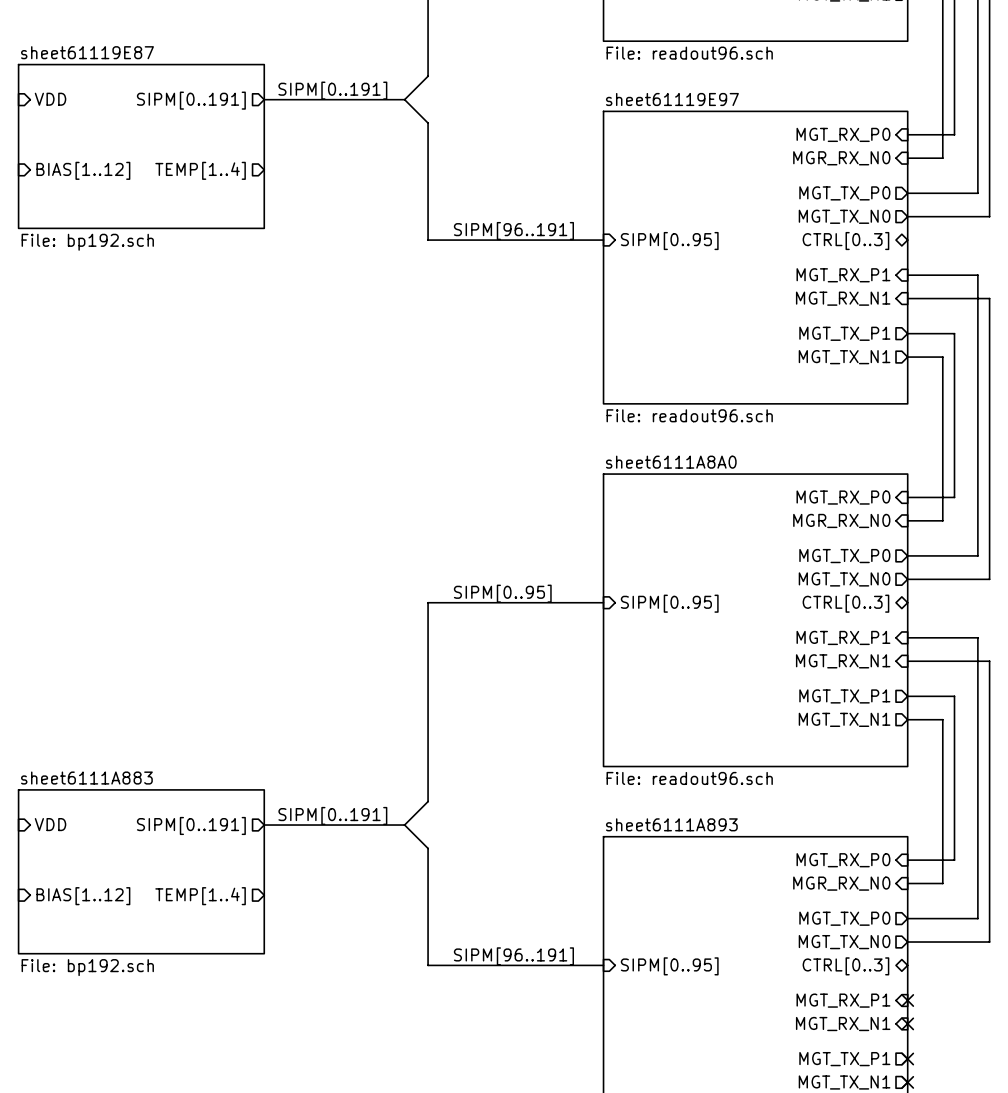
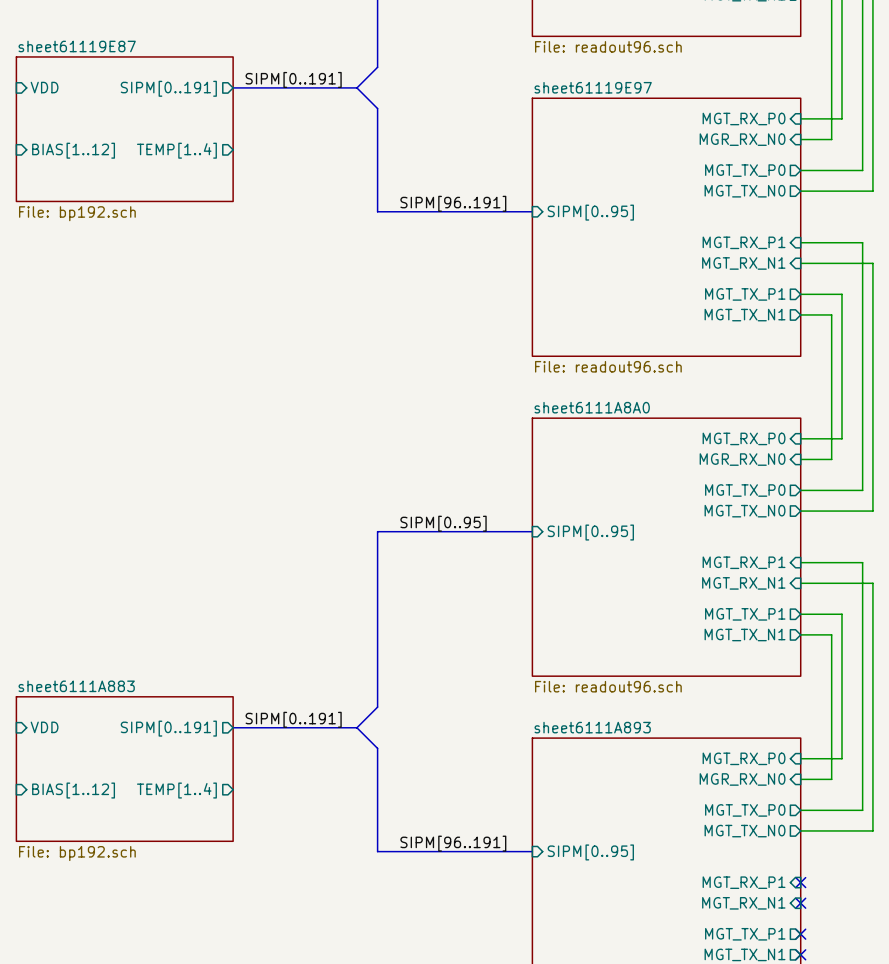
sheet pin: CTRL[0..3] (845, 241) -> none
sheet pin: CTRL[0..3] (845, 603) -> none
sheet pin: CTRL[0..3] (845, 966) -> none

